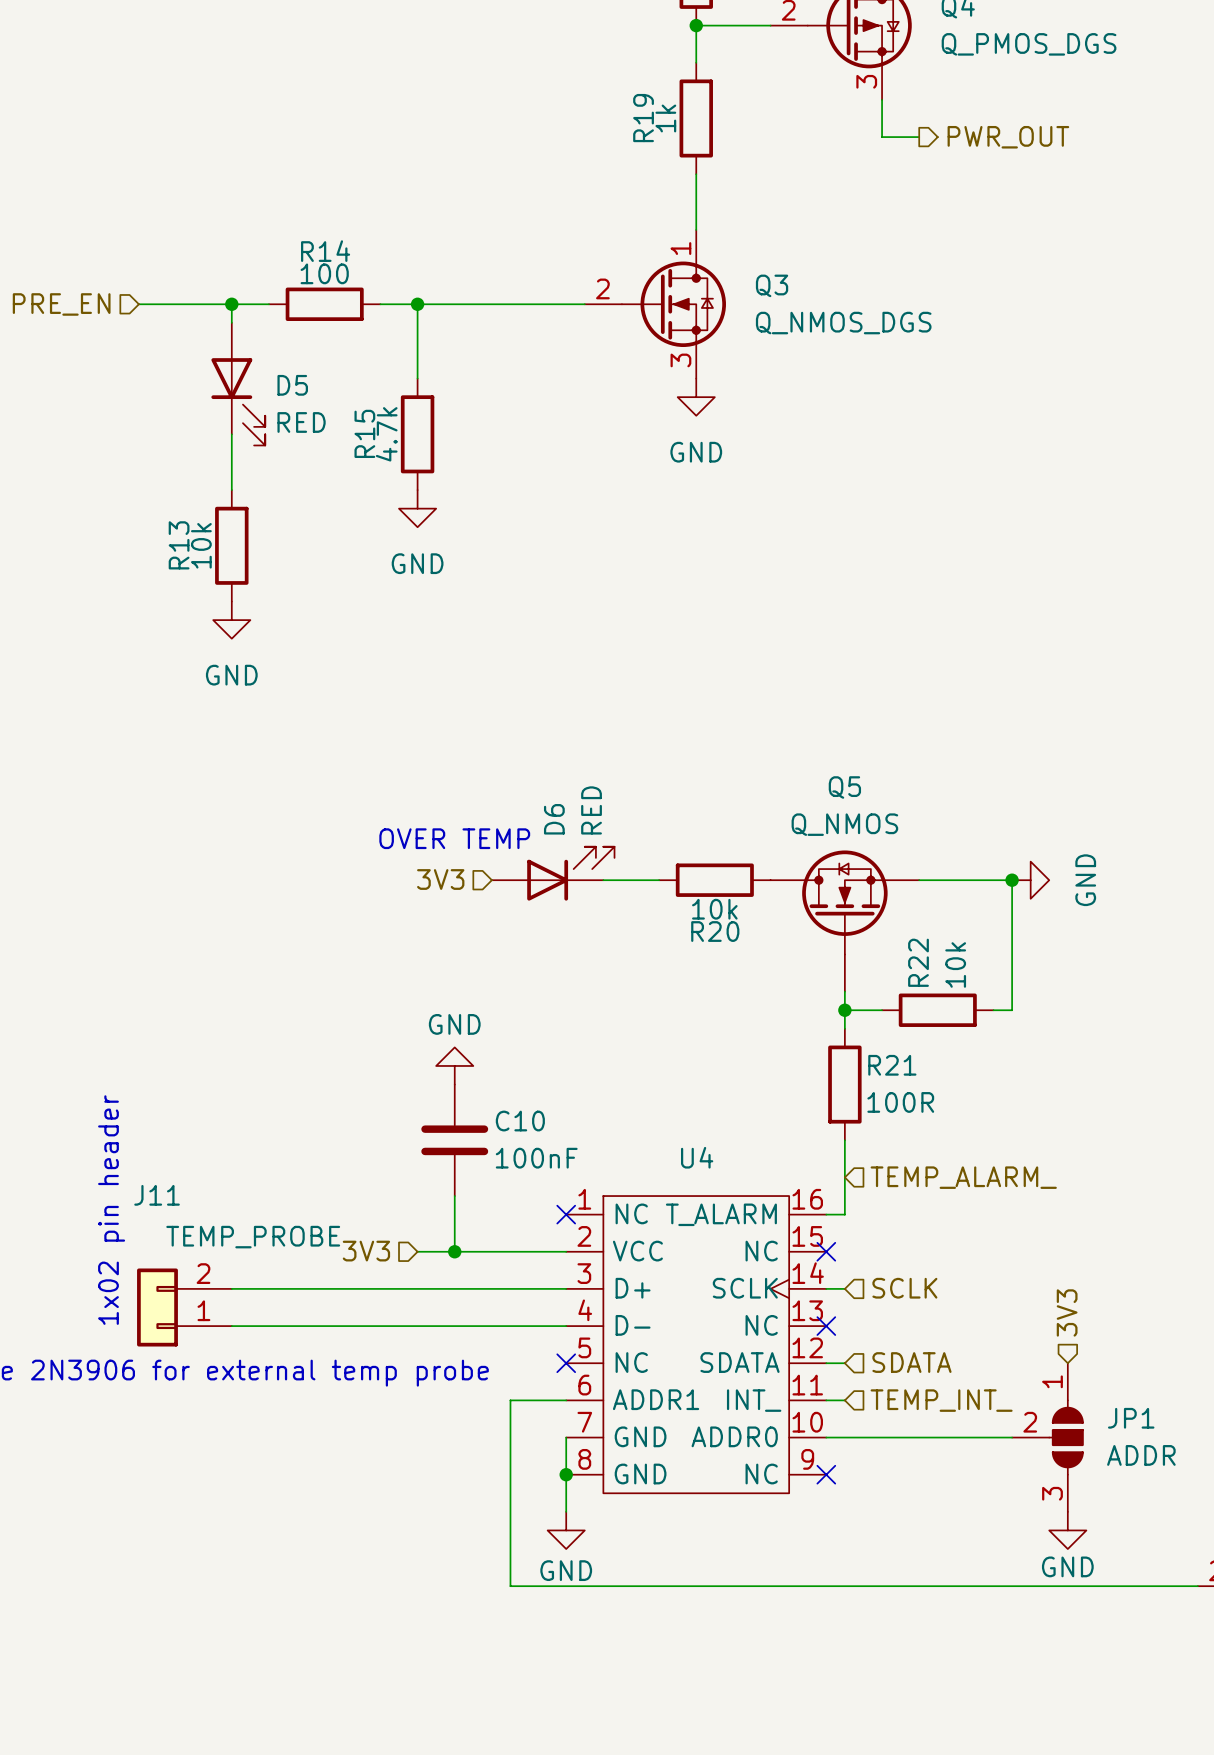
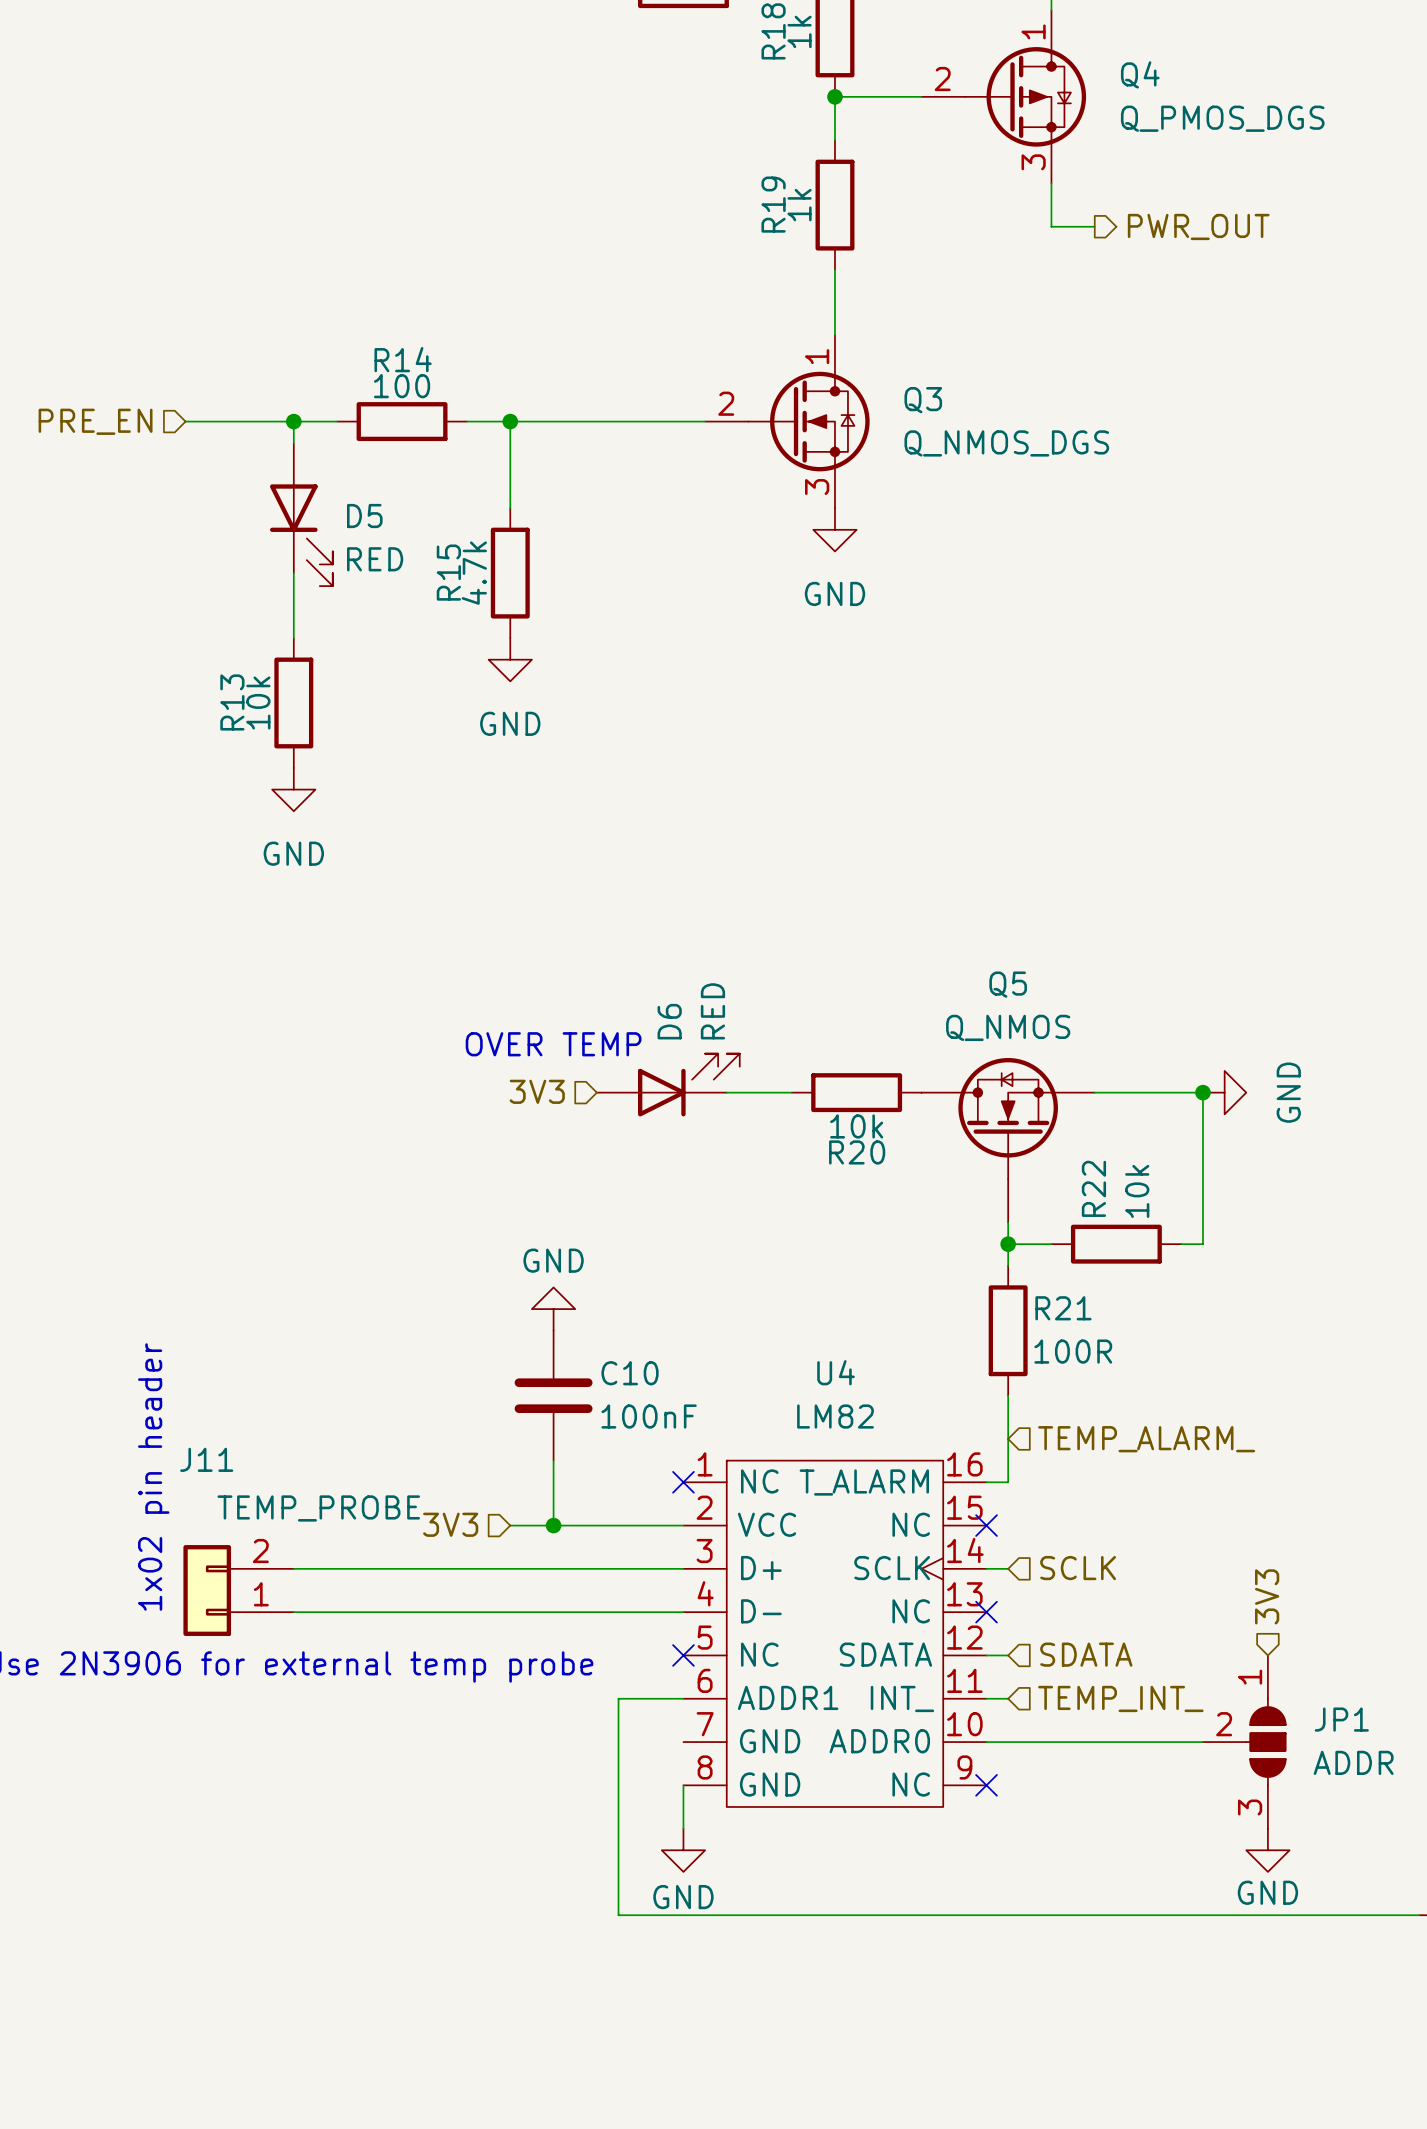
U4 name position: U4 (697, 1157) -> U4 (836, 1372)
U4 value: none -> LM82 (835, 1416)
wire: (566, 1437) (566, 1474) -> none
junction: (566, 1474) -> none

